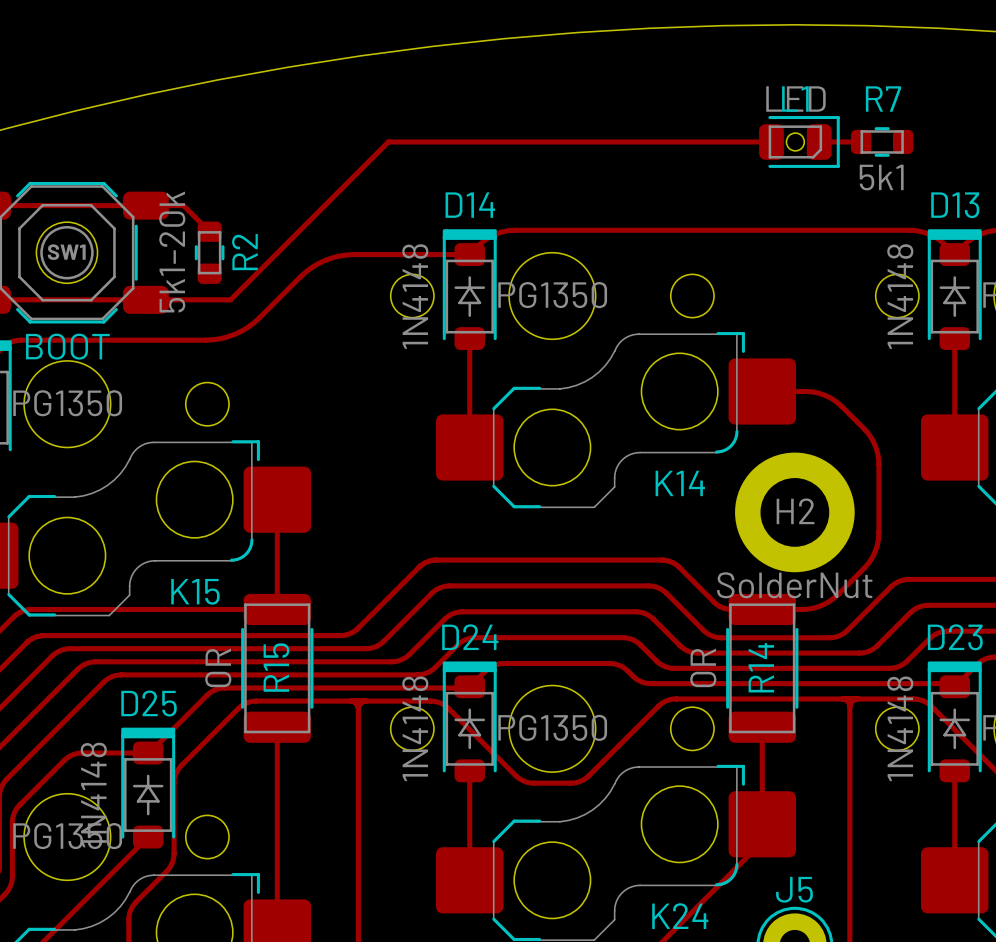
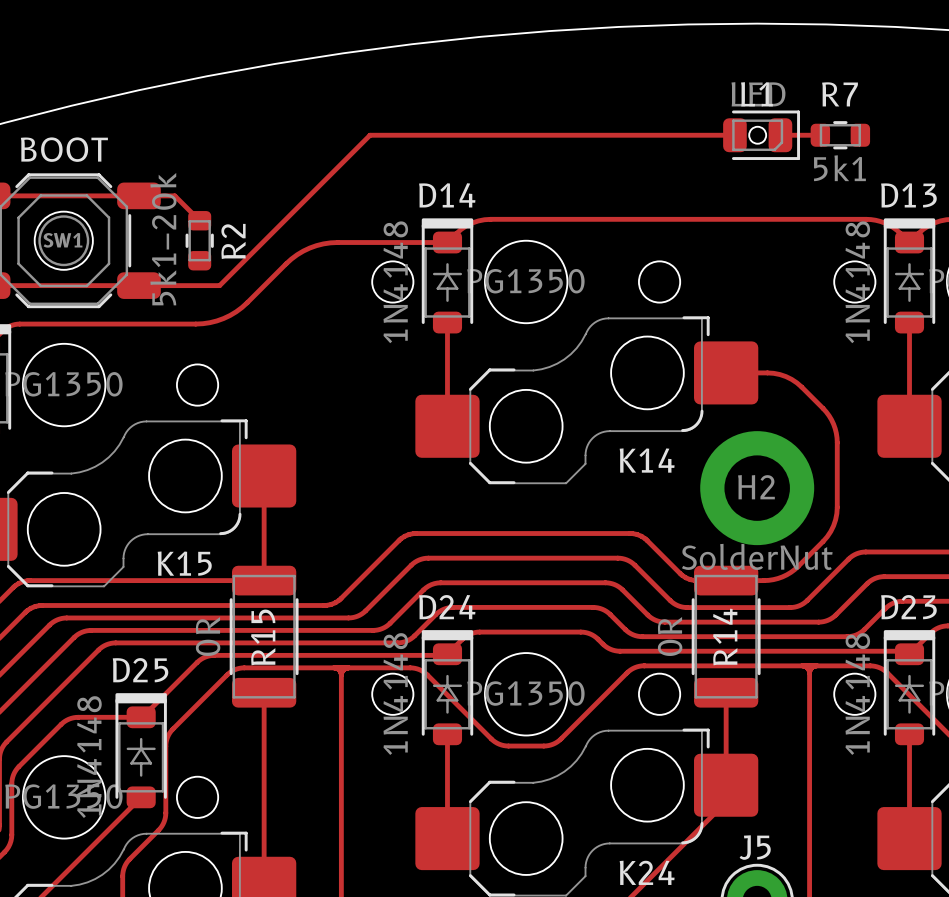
SW1 value position: BOOT (67, 346) -> BOOT (64, 149)

